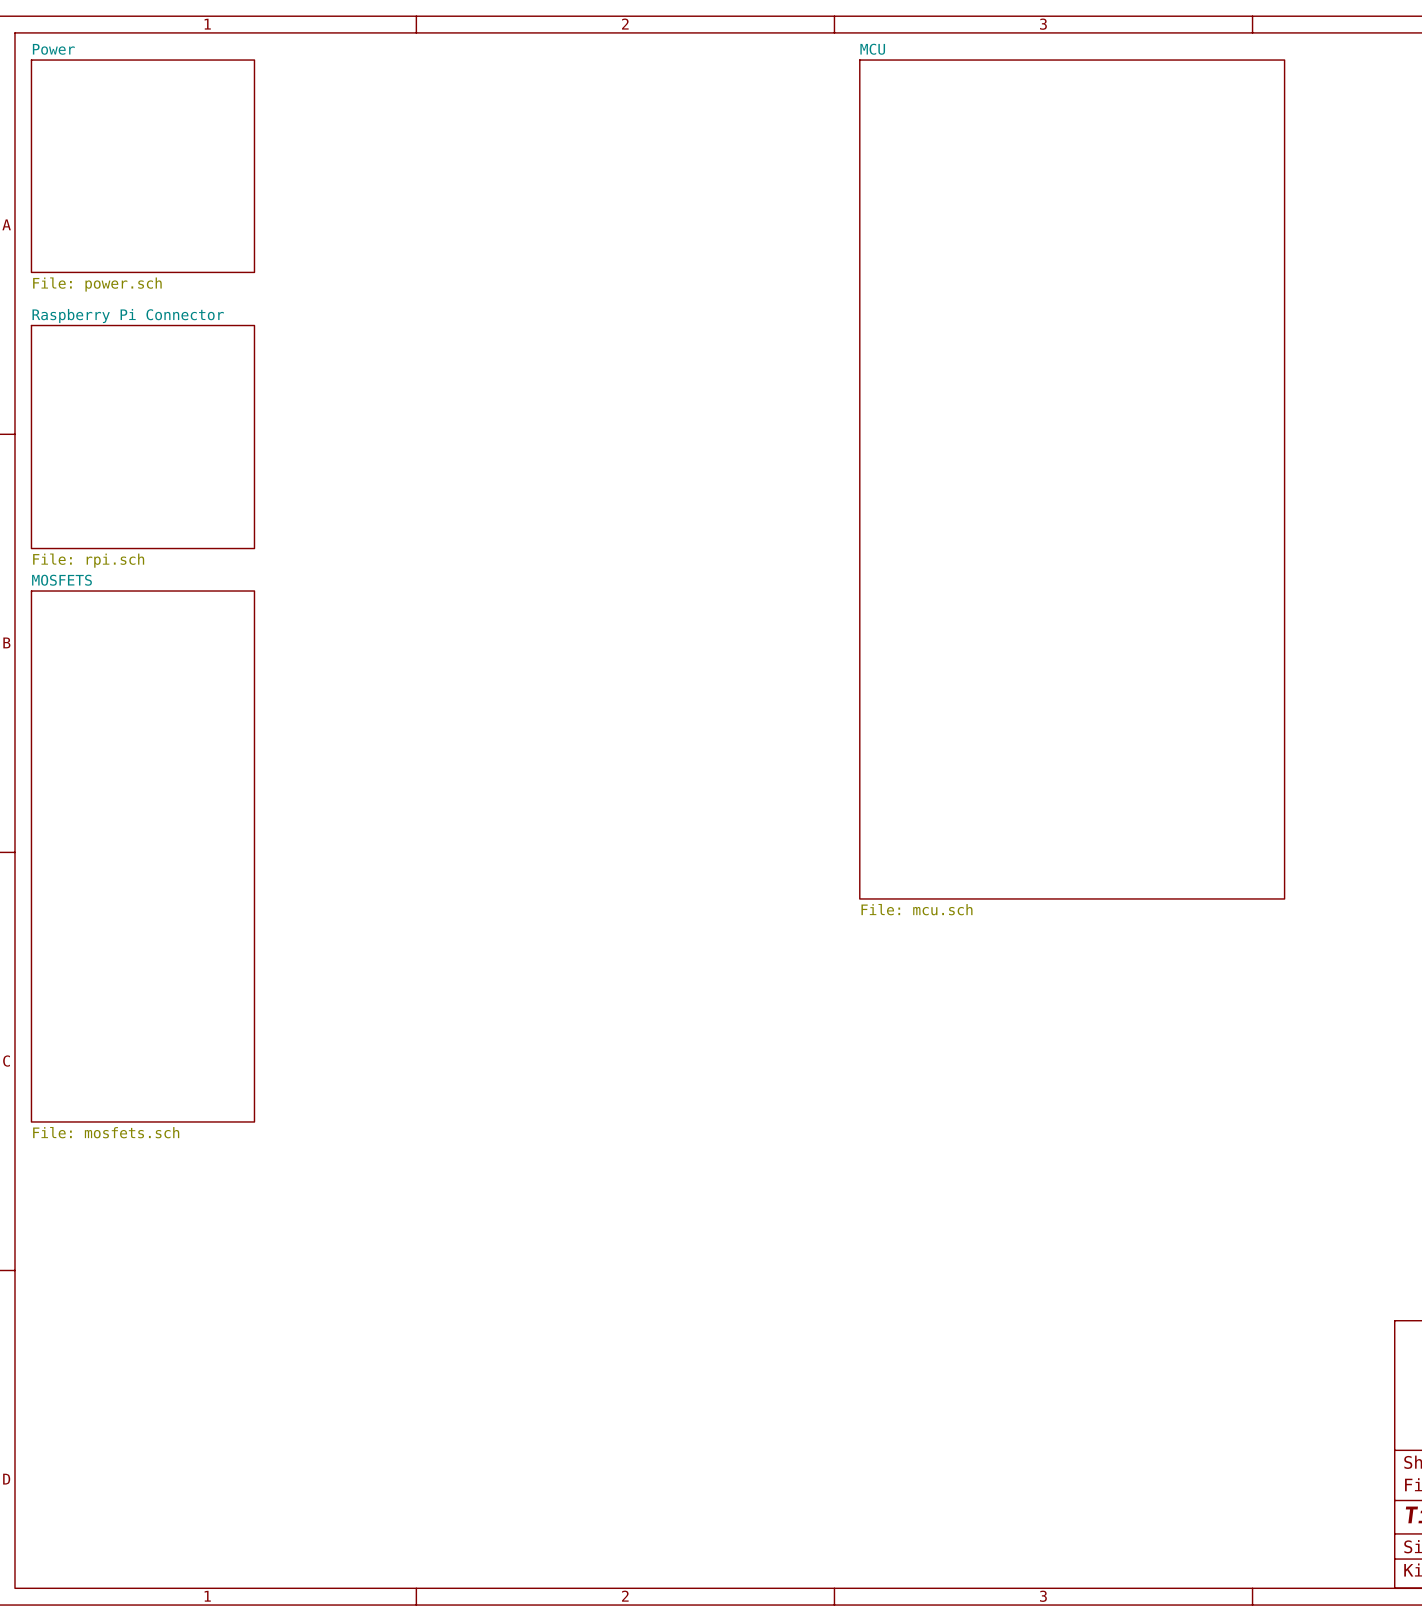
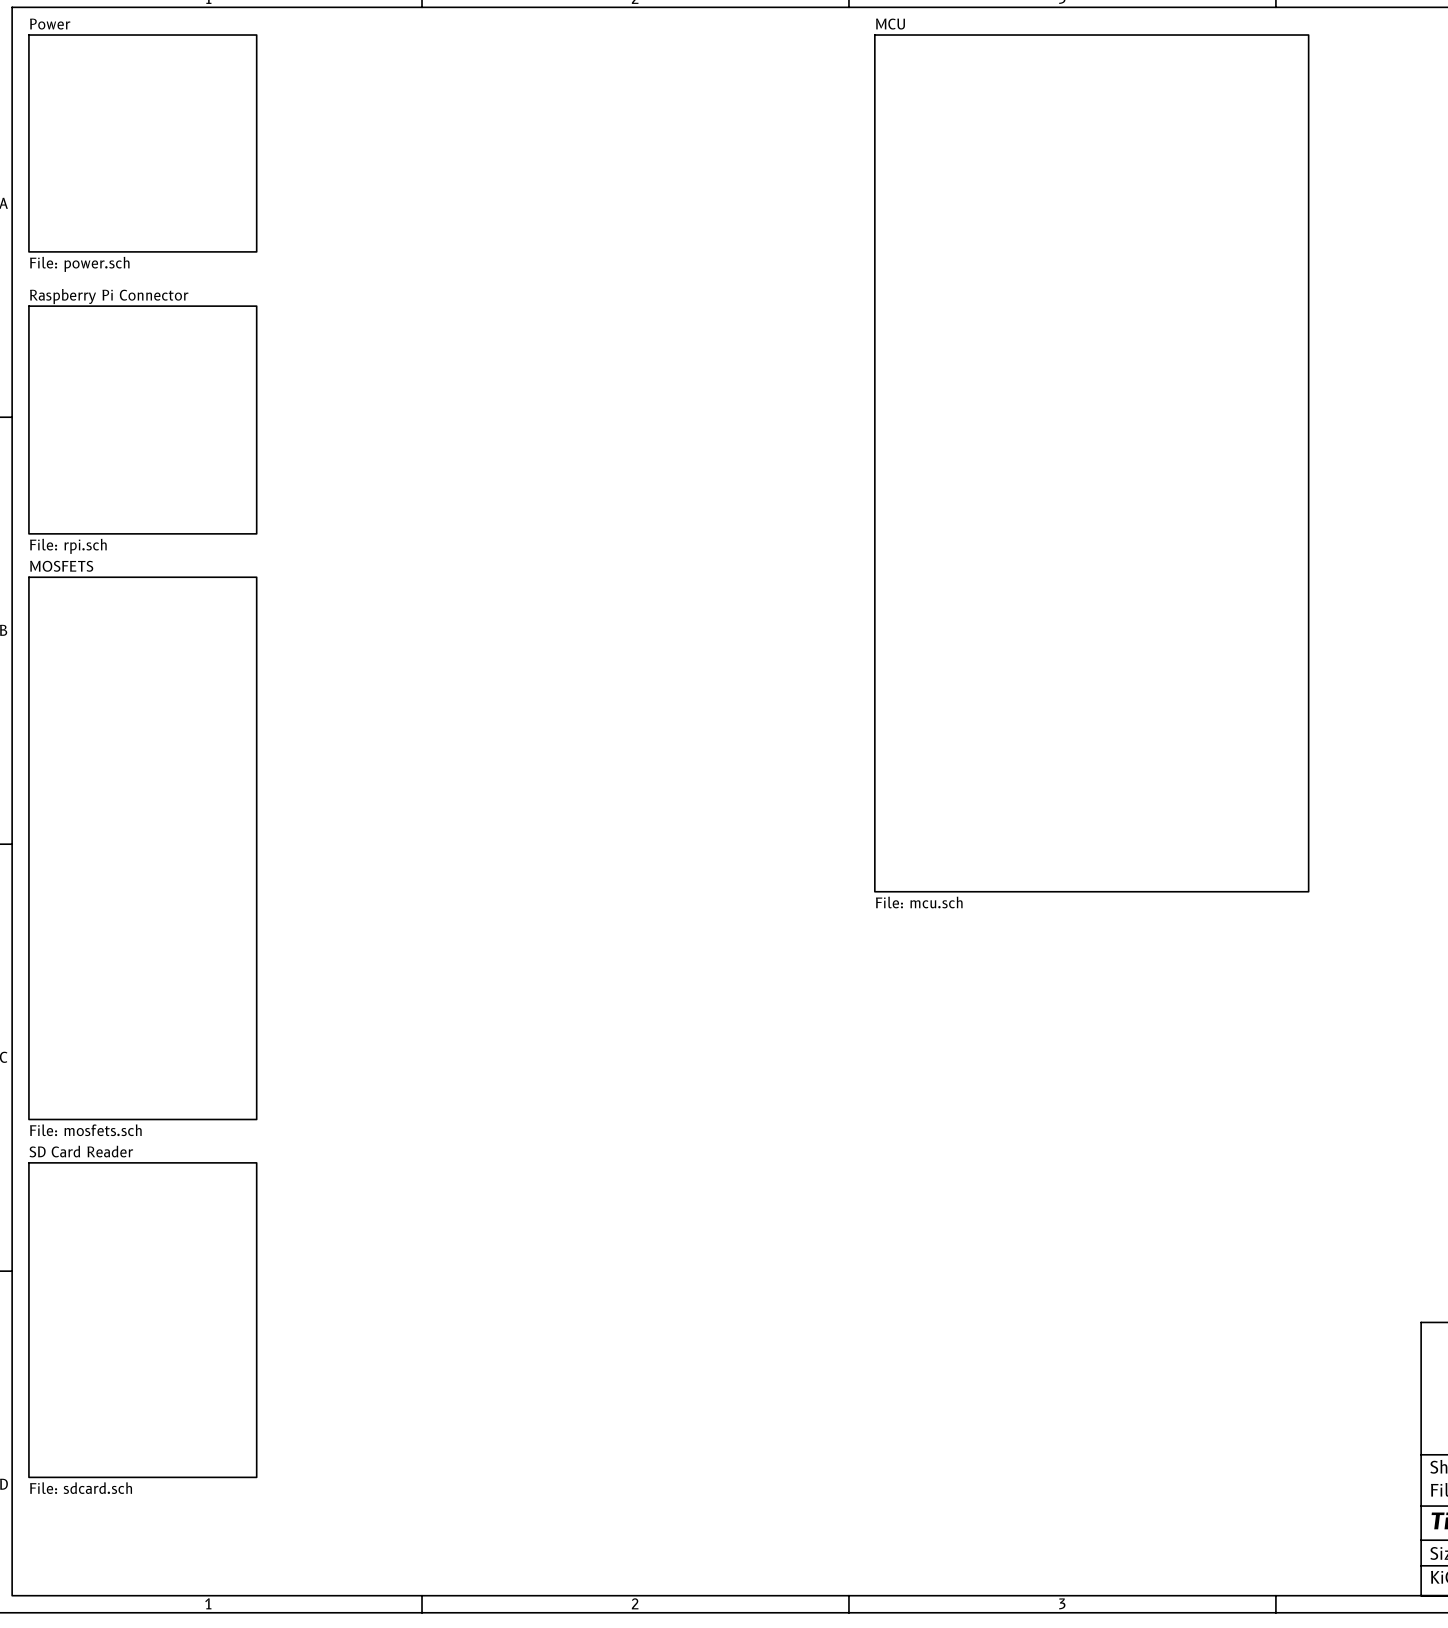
sheet SD Card Reader: none -> File: sdcard.sch (142, 1320)

